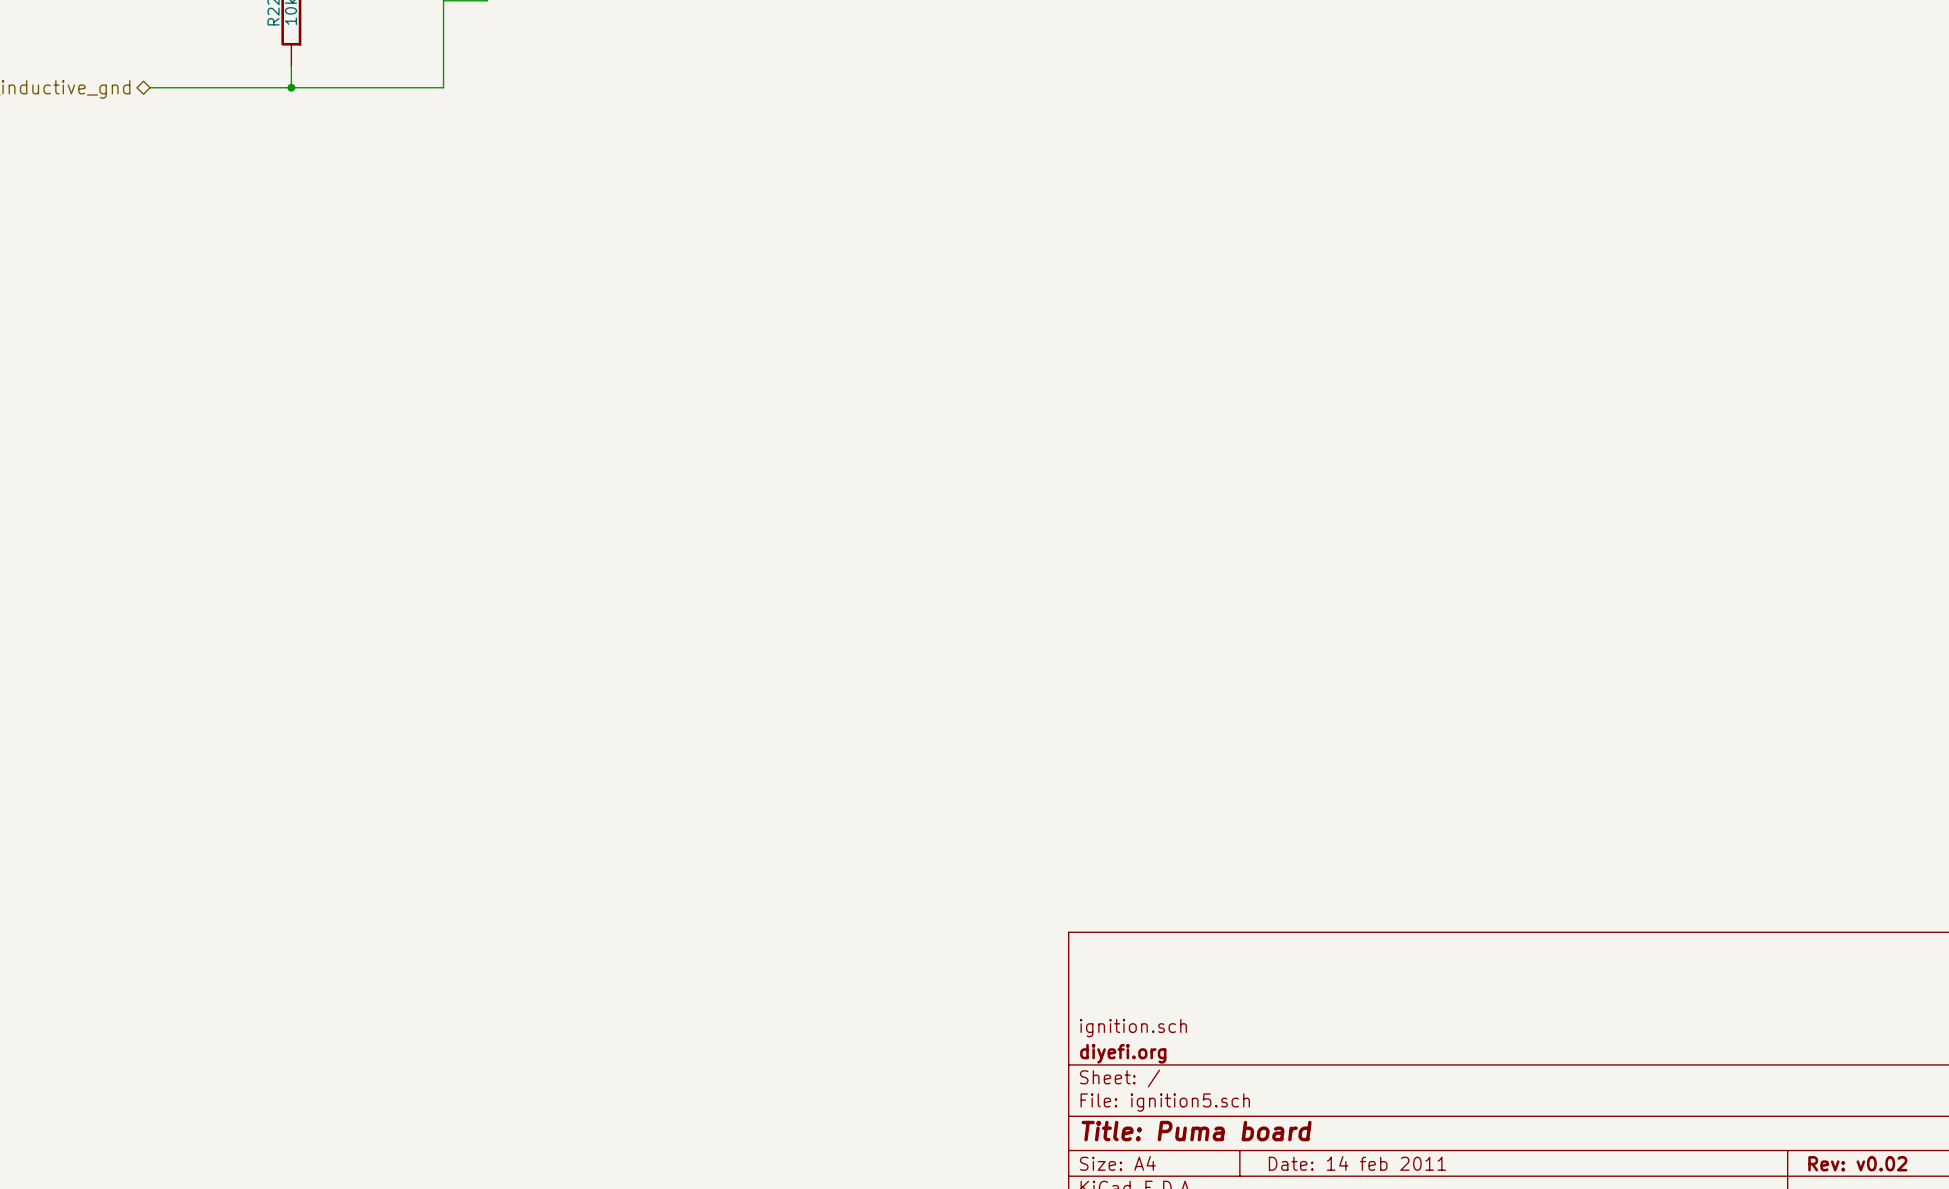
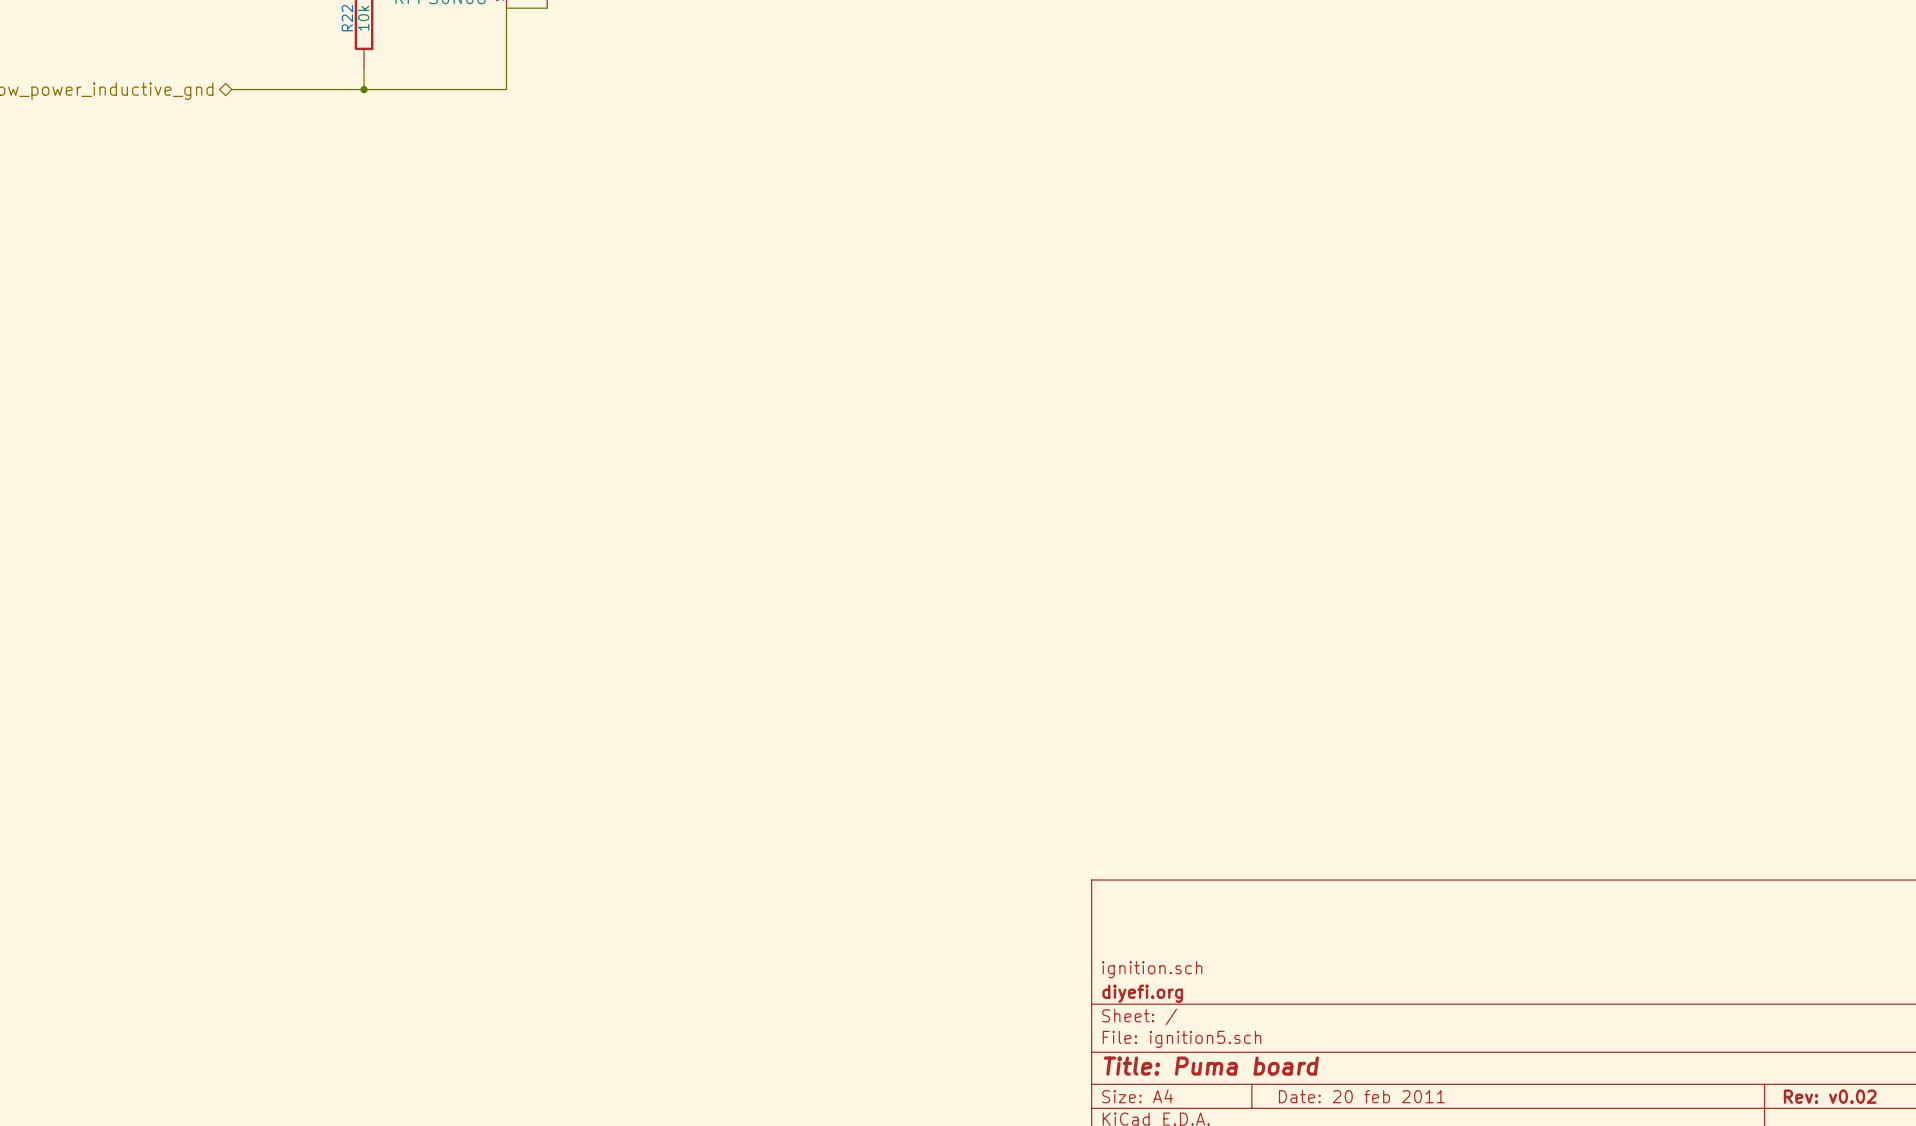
title block: Date: 14 feb 2011 (1357, 1163) -> Date: 20 feb 2011 (1361, 1096)

